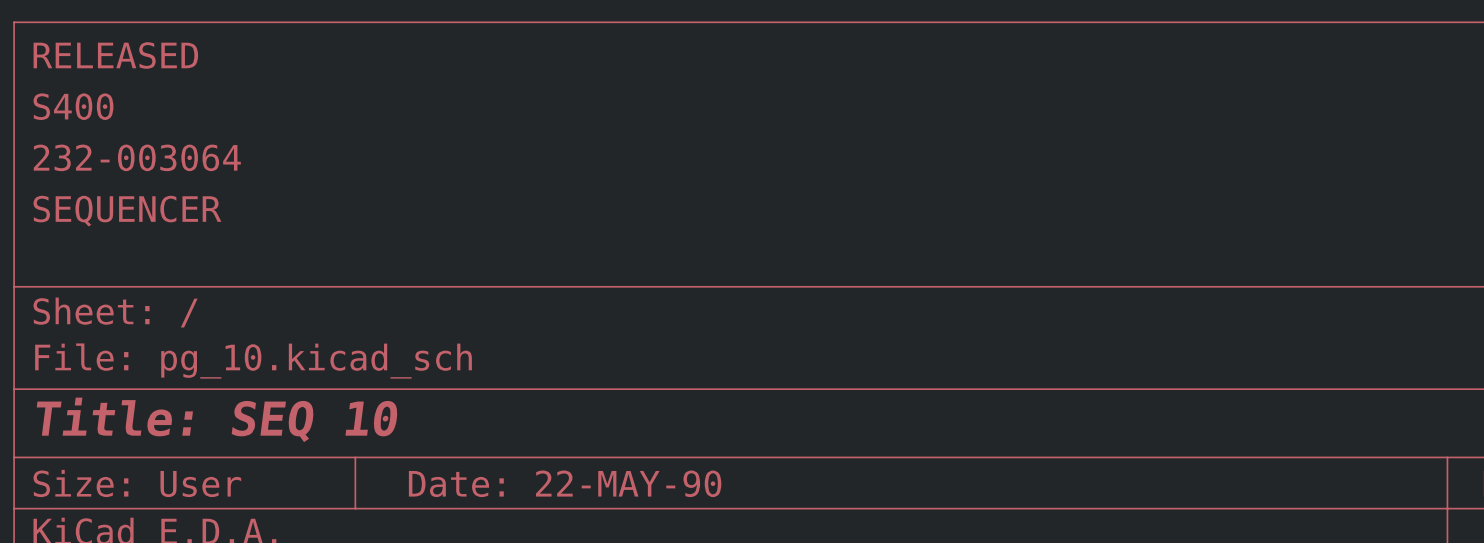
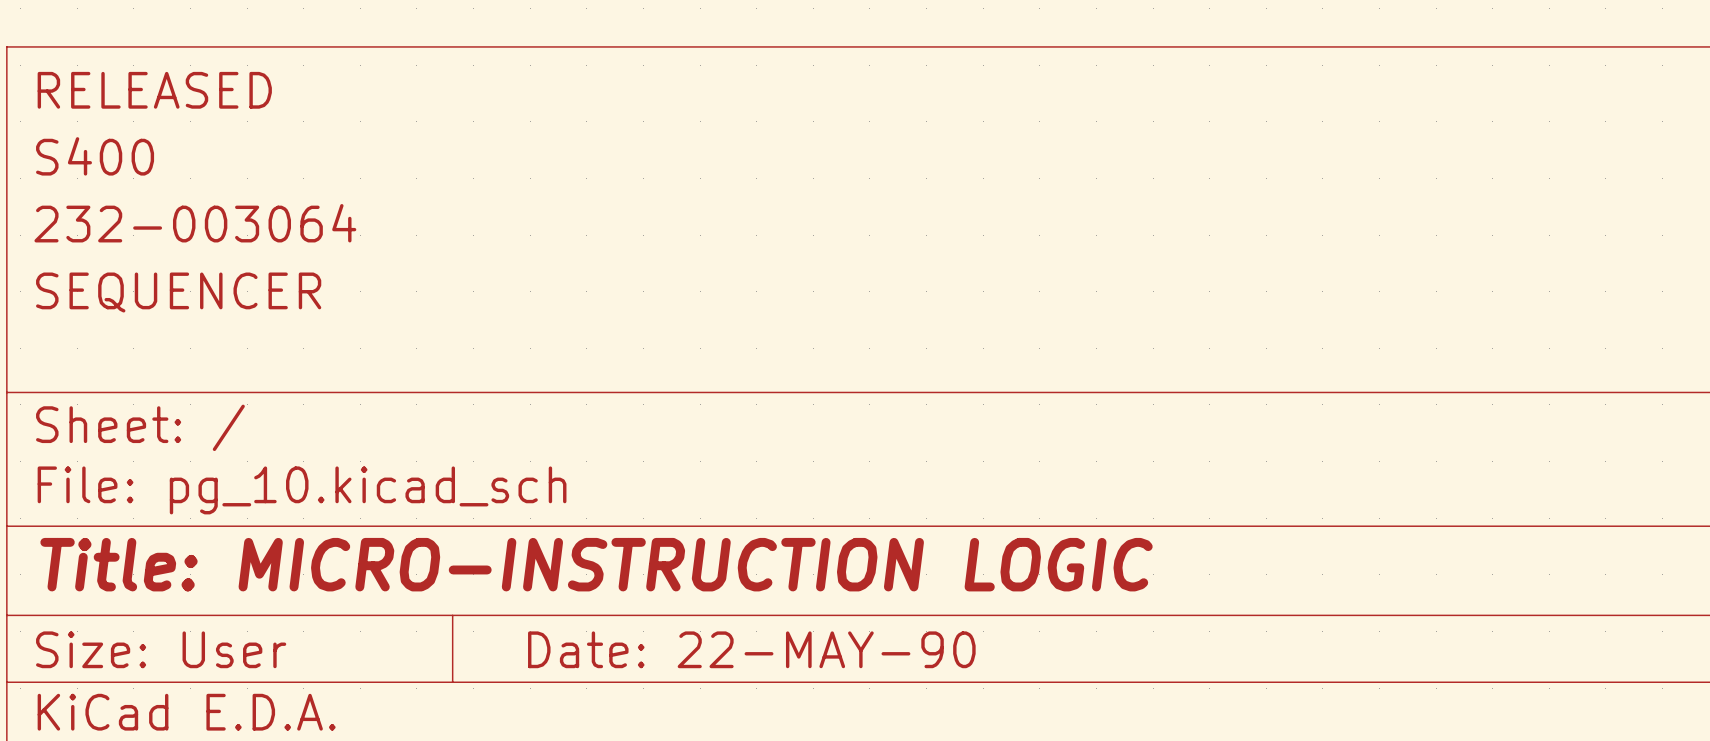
title block: Title: SEQ 10 (217, 419) -> Title: MICRO-INSTRUCTION LOGIC (596, 564)

